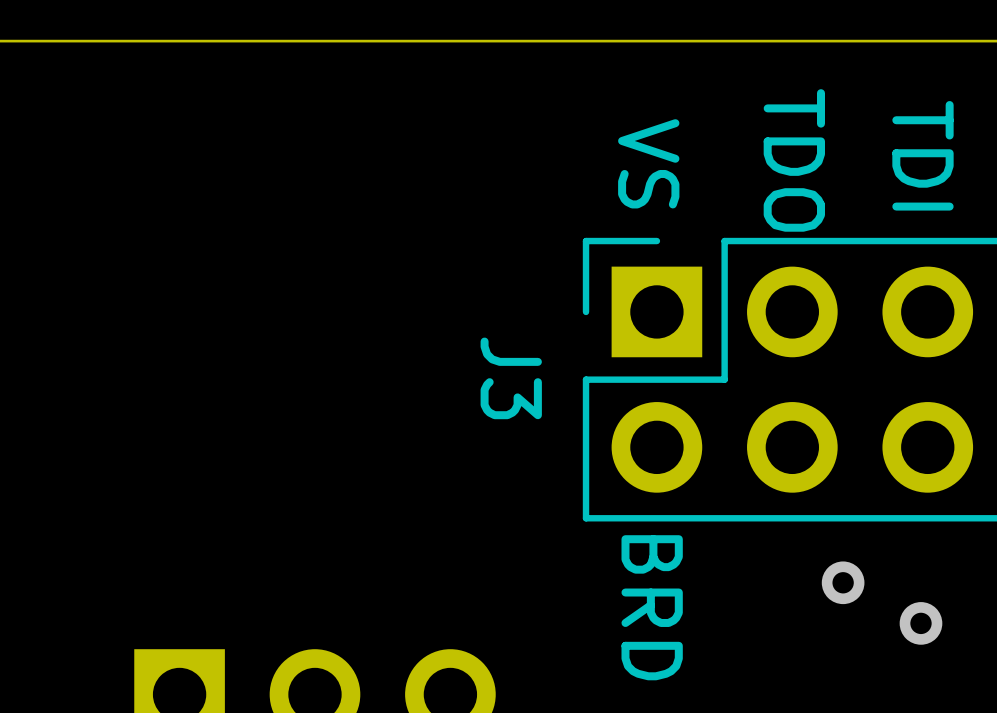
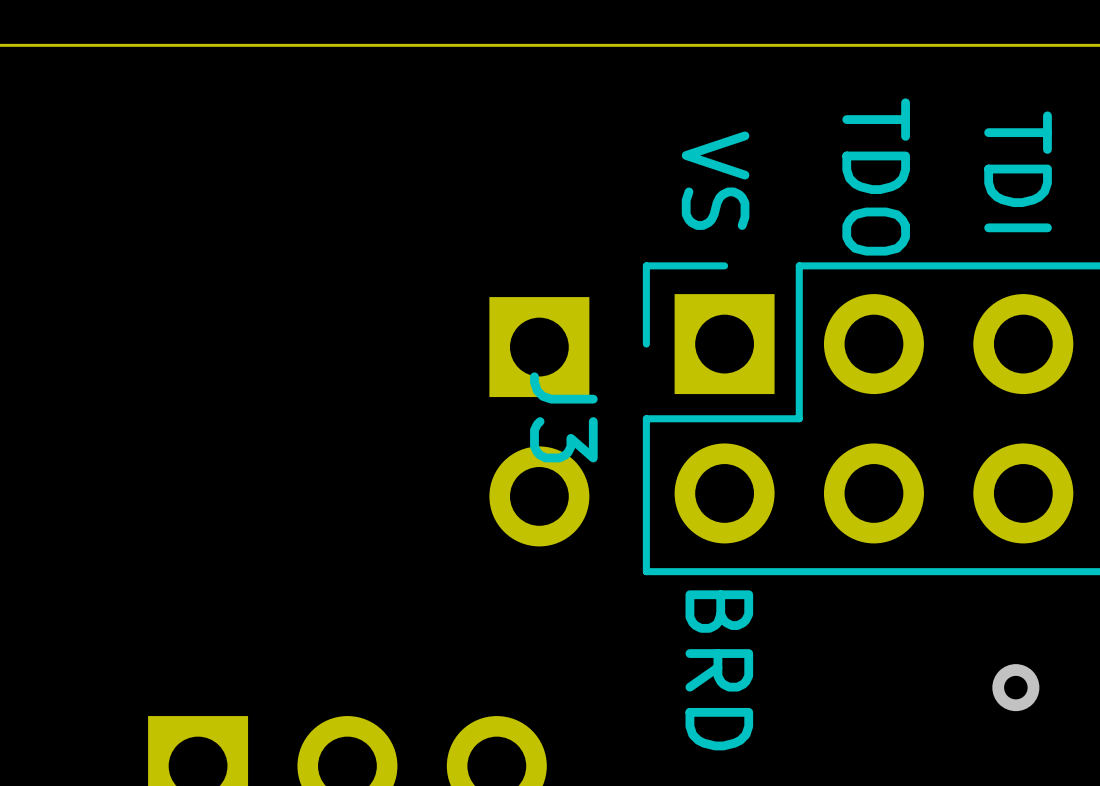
part: none -> (539, 421)
via: (843, 582) -> none

